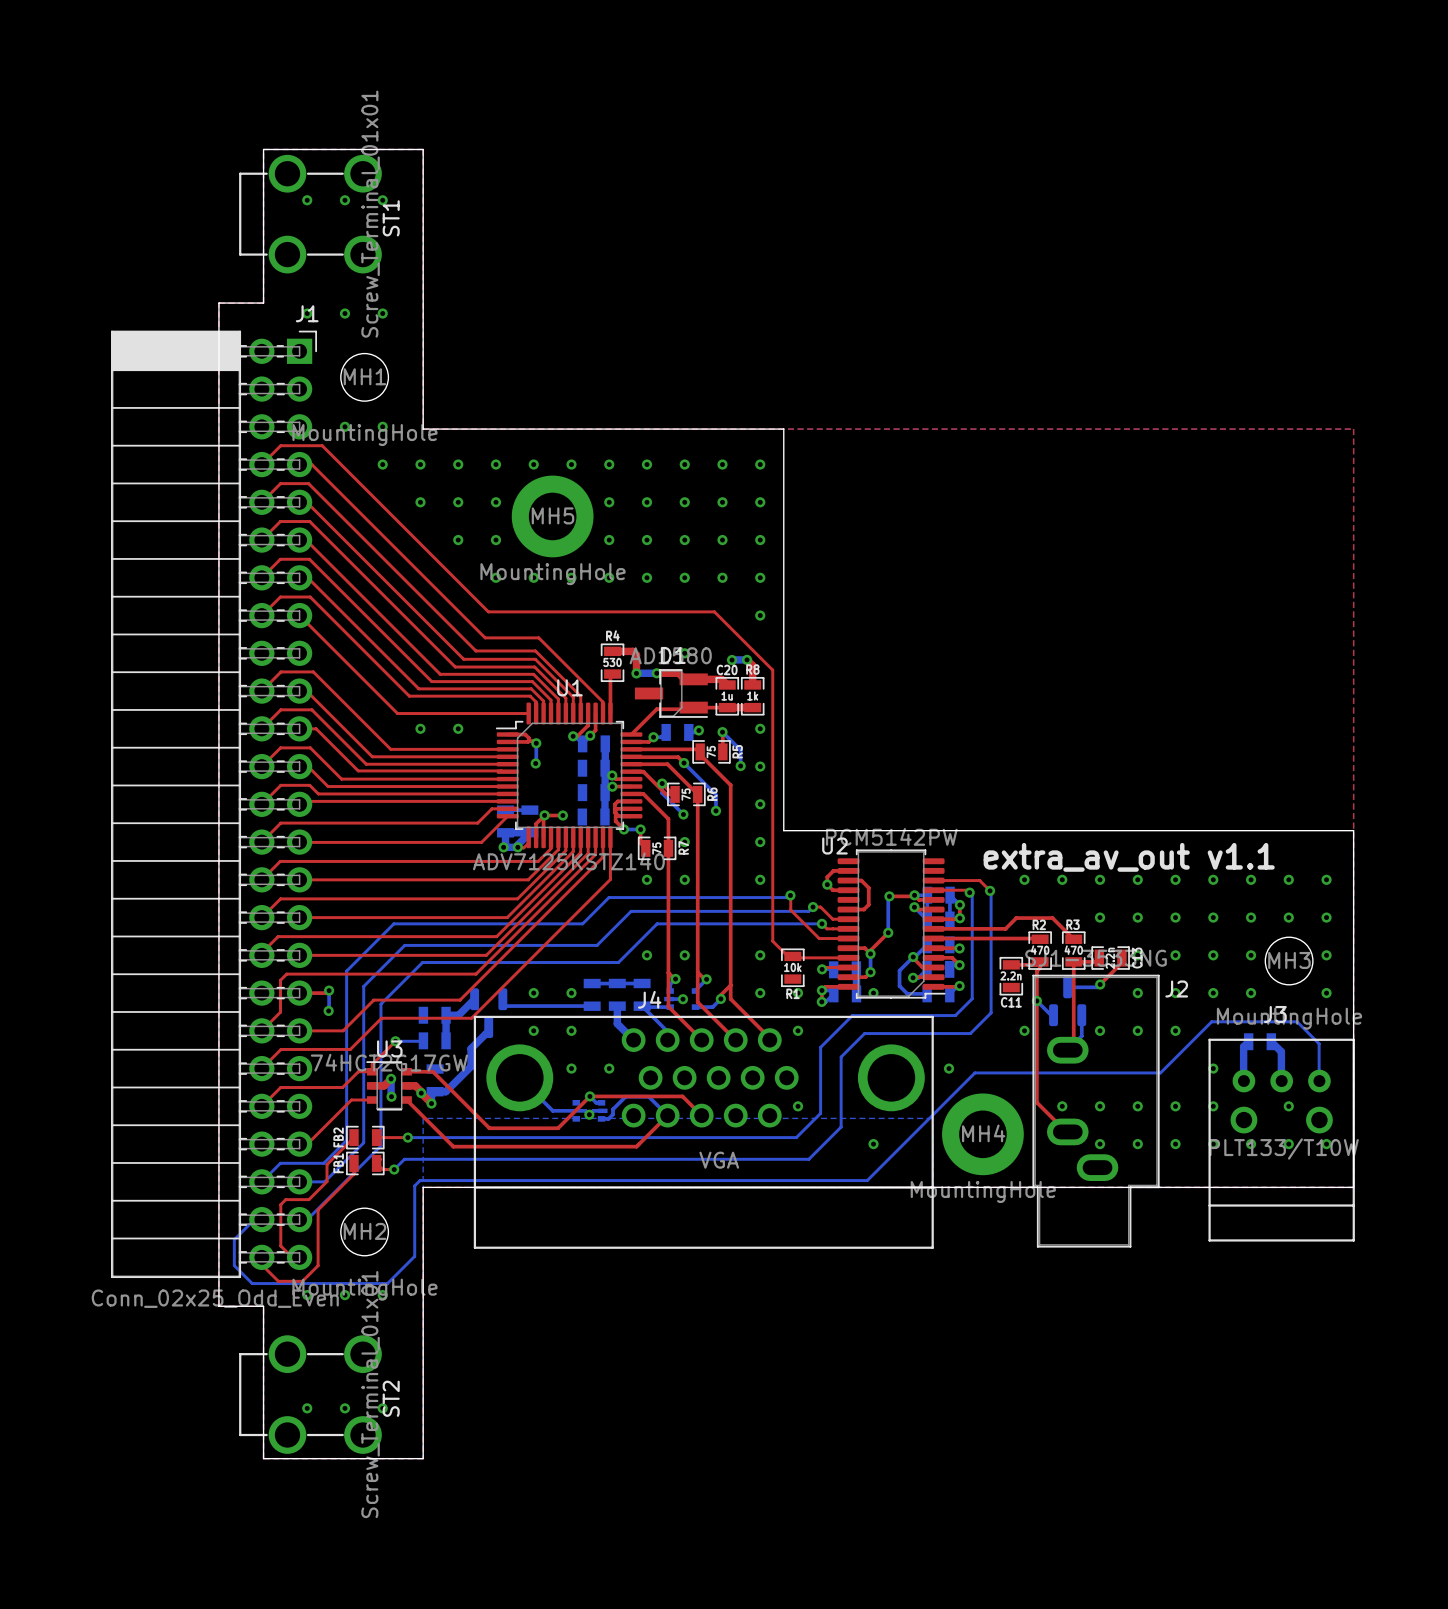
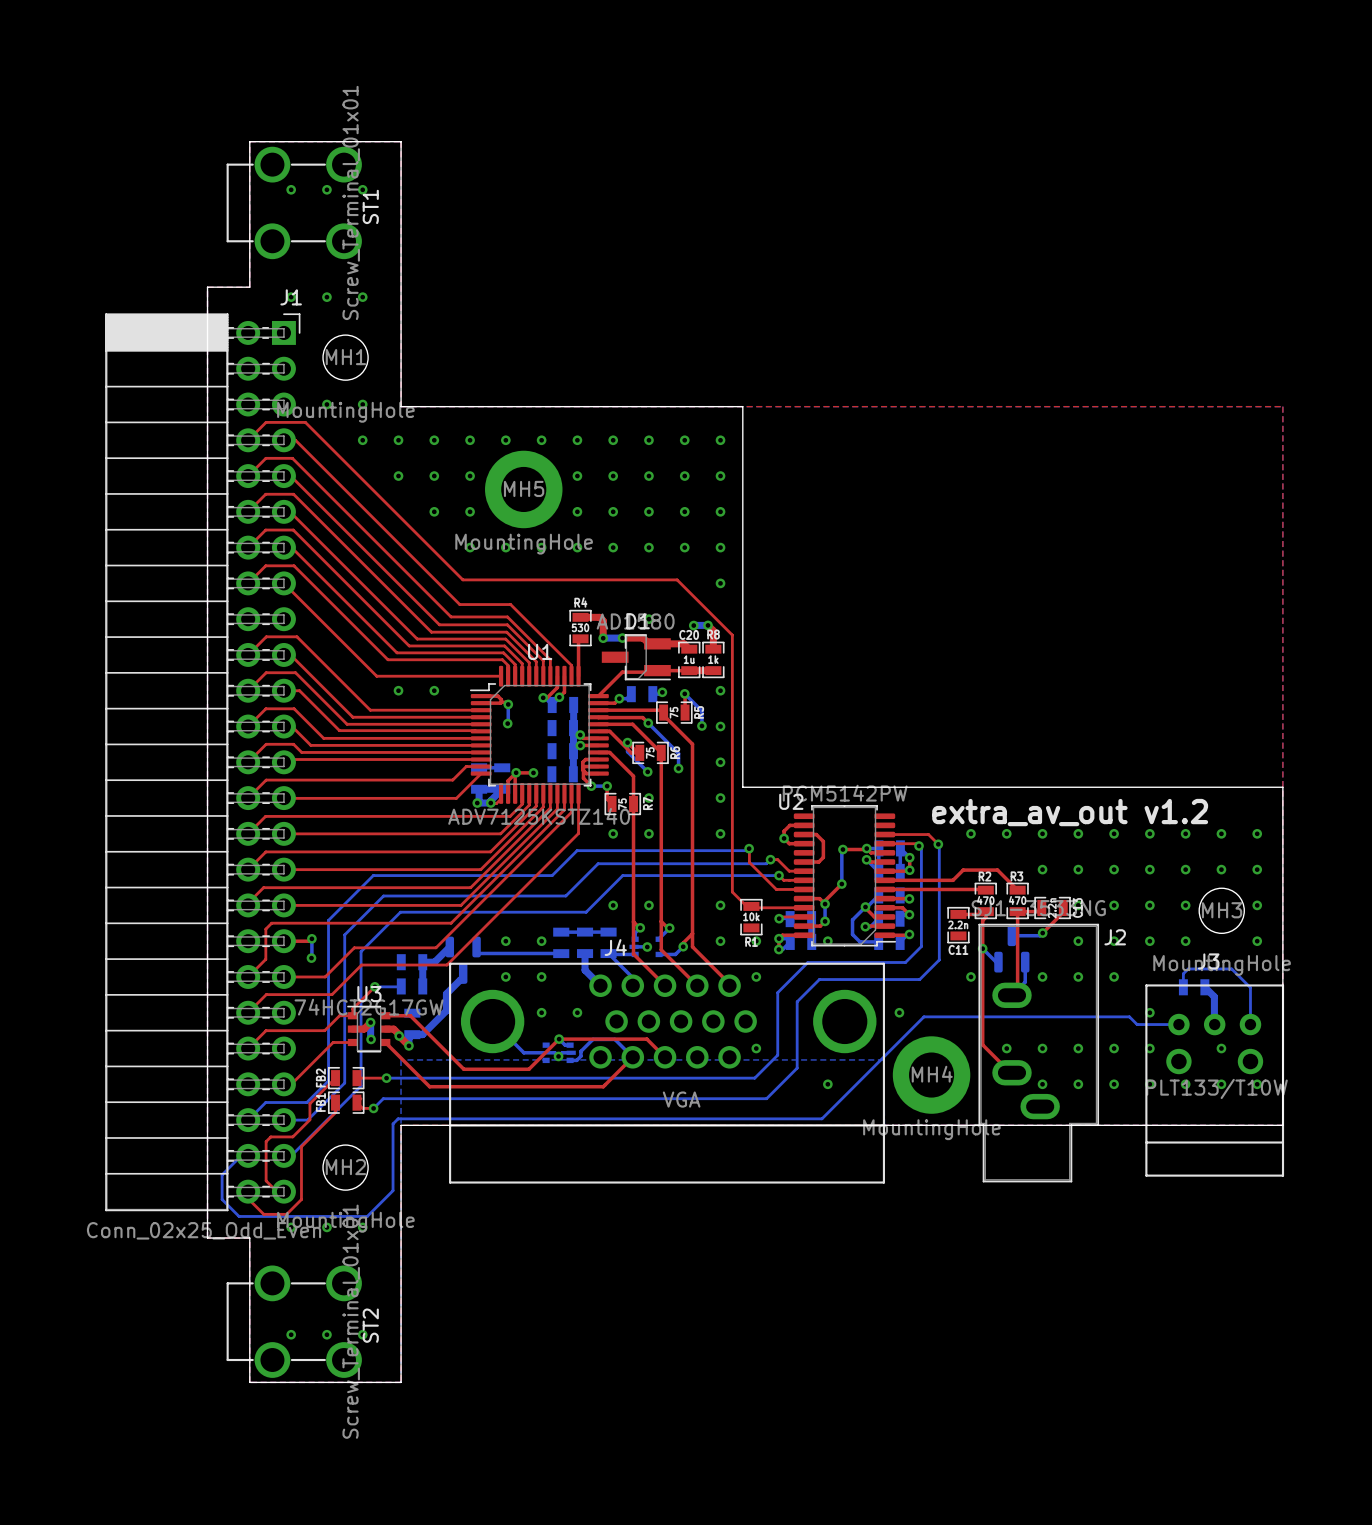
text: extra_av_out v1.1 (1129, 857) -> extra_av_out v1.2 (1070, 812)
bottom track: (1248, 1041) (1243, 1046) (1243, 1077) -> (1183, 987) (1183, 973) (1188, 968) (1231, 968) (1250, 987) (1250, 1024)
bottom track: (1160, 1072) (1211, 1021) (1297, 1021) (1319, 1043) (1319, 1080) -> (1099, 1016) (1129, 1016) (1137, 1024) (1178, 1024)

